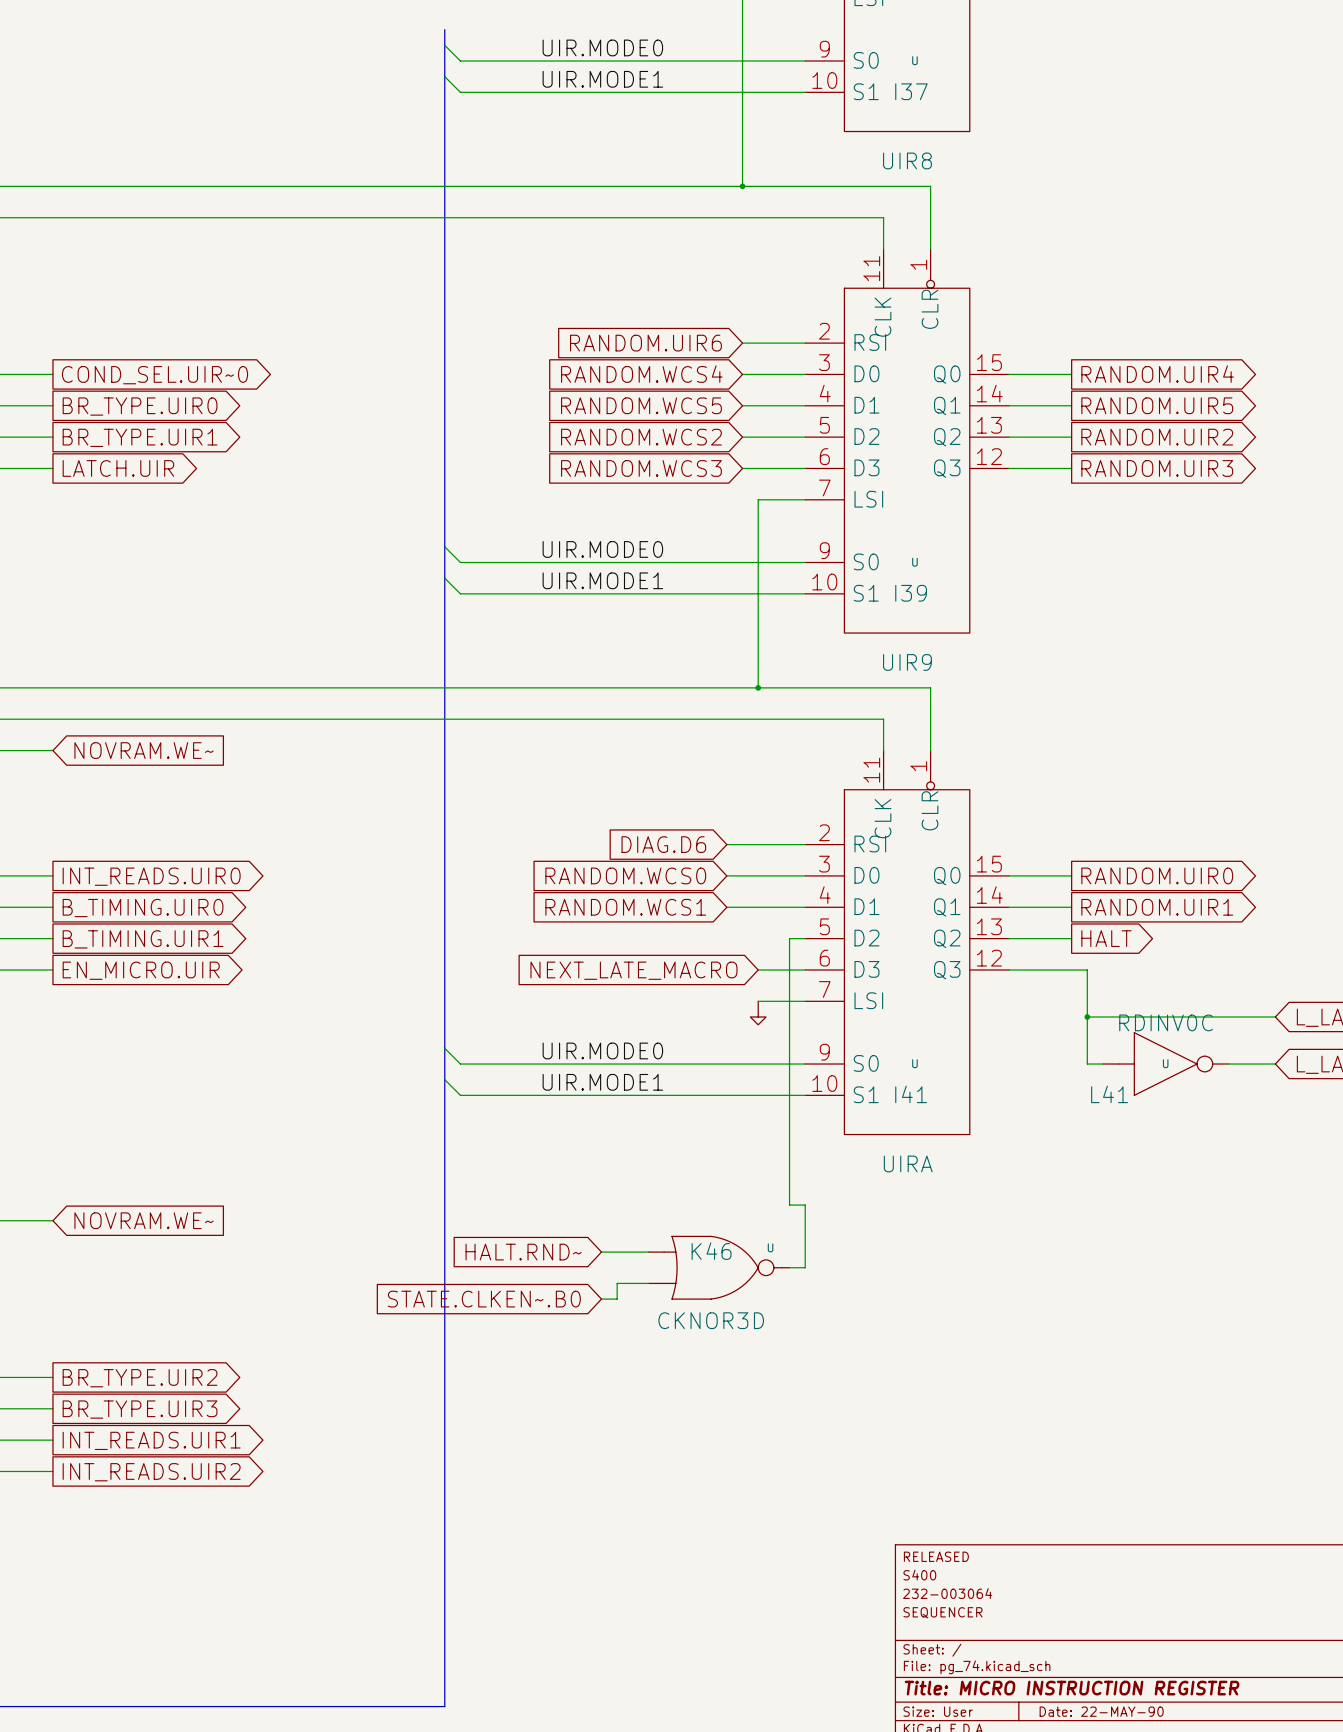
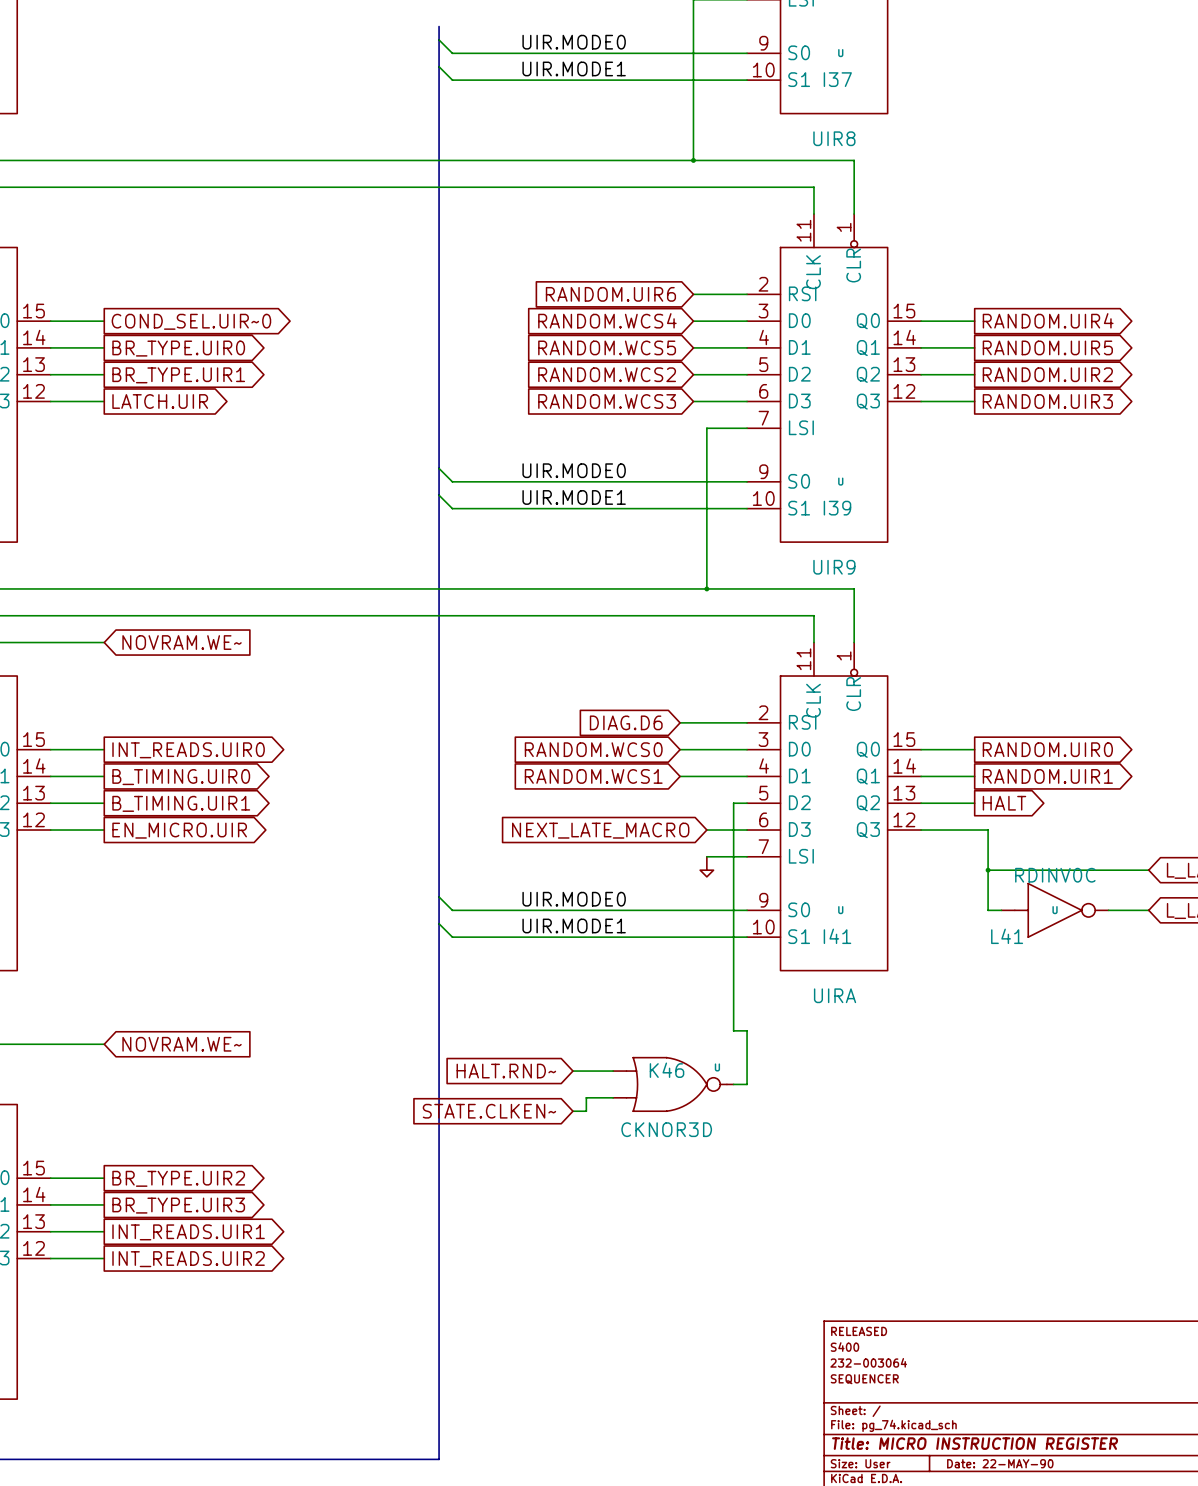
global label: STATE.CLKEN~.B0 (484, 1299) -> STATE.CLKEN~ (489, 1111)

